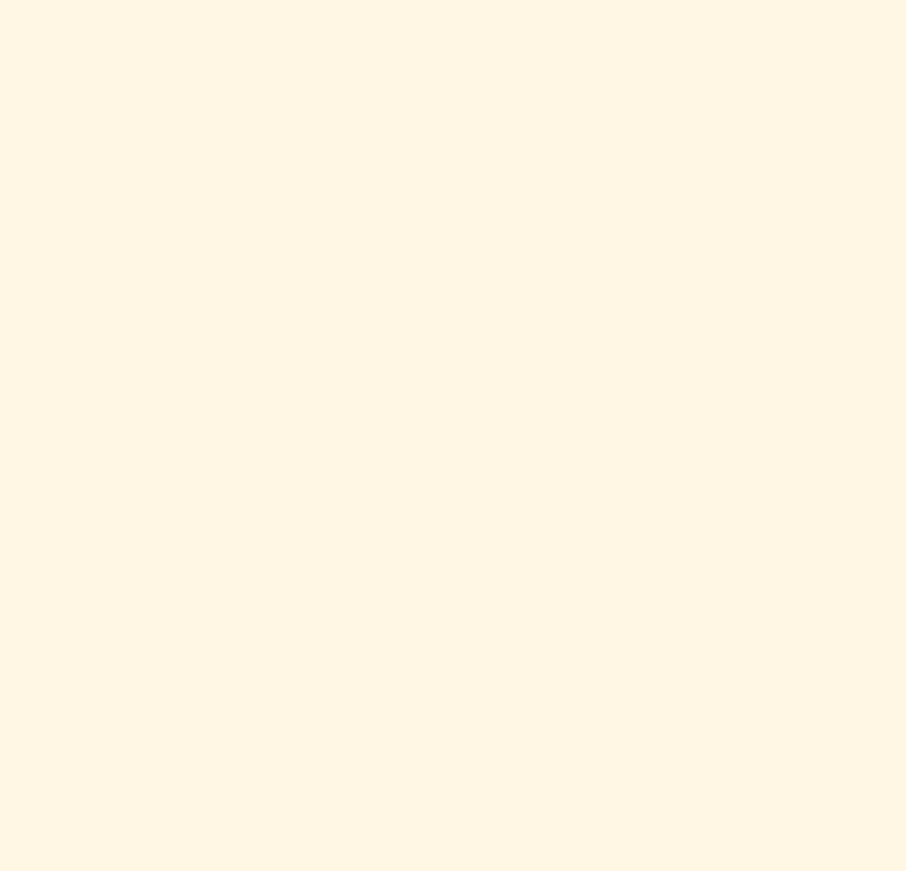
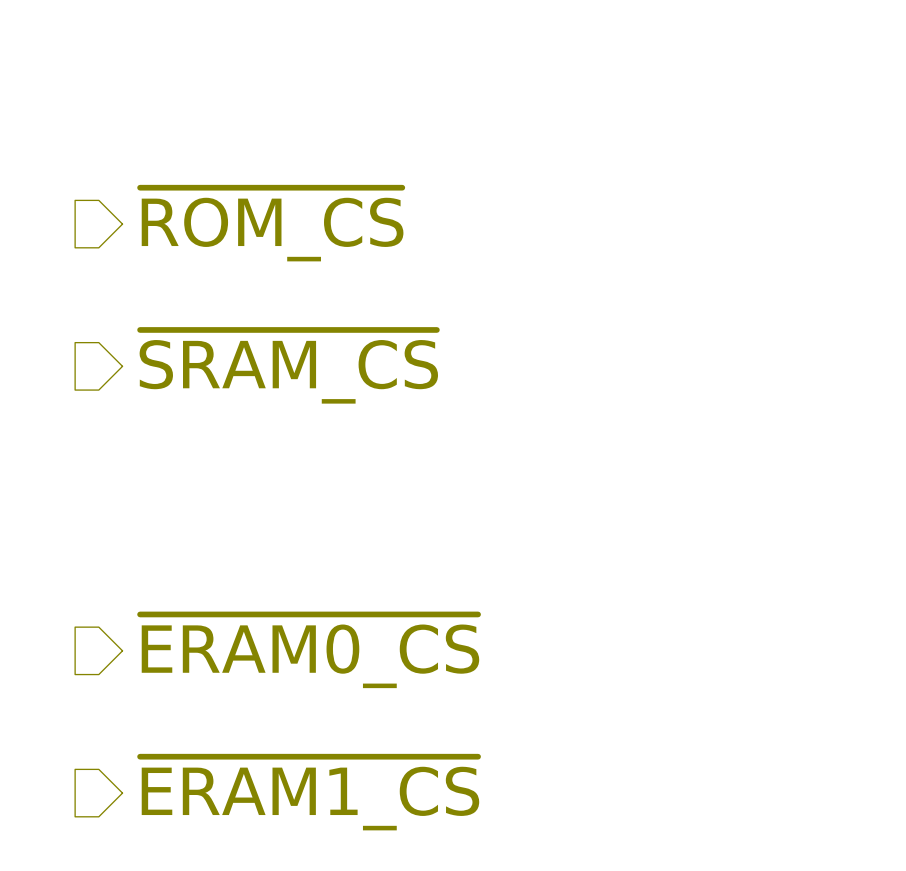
hierarchical label: none -> ~{ROM_CS} (271, 224)
hierarchical label: none -> ~{SRAM_CS} (288, 366)
hierarchical label: none -> ~{ERAM0_CS} (309, 651)
hierarchical label: none -> ~{ERAM1_CS} (309, 793)

